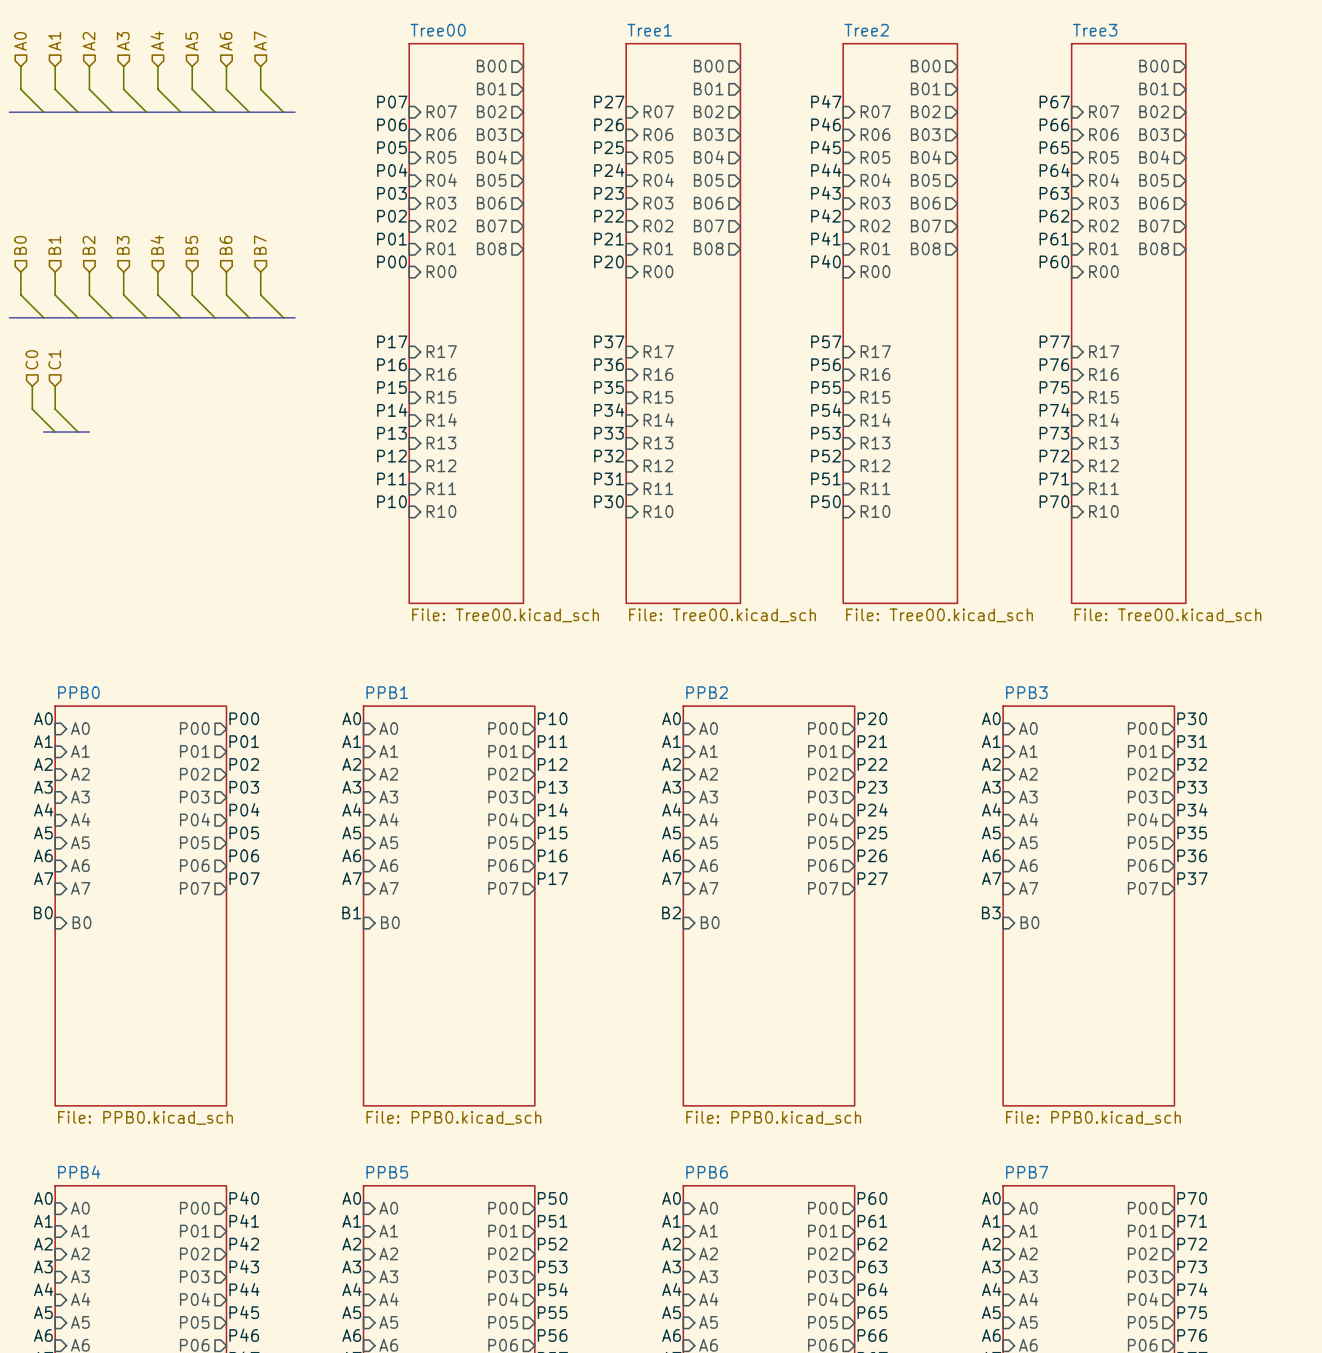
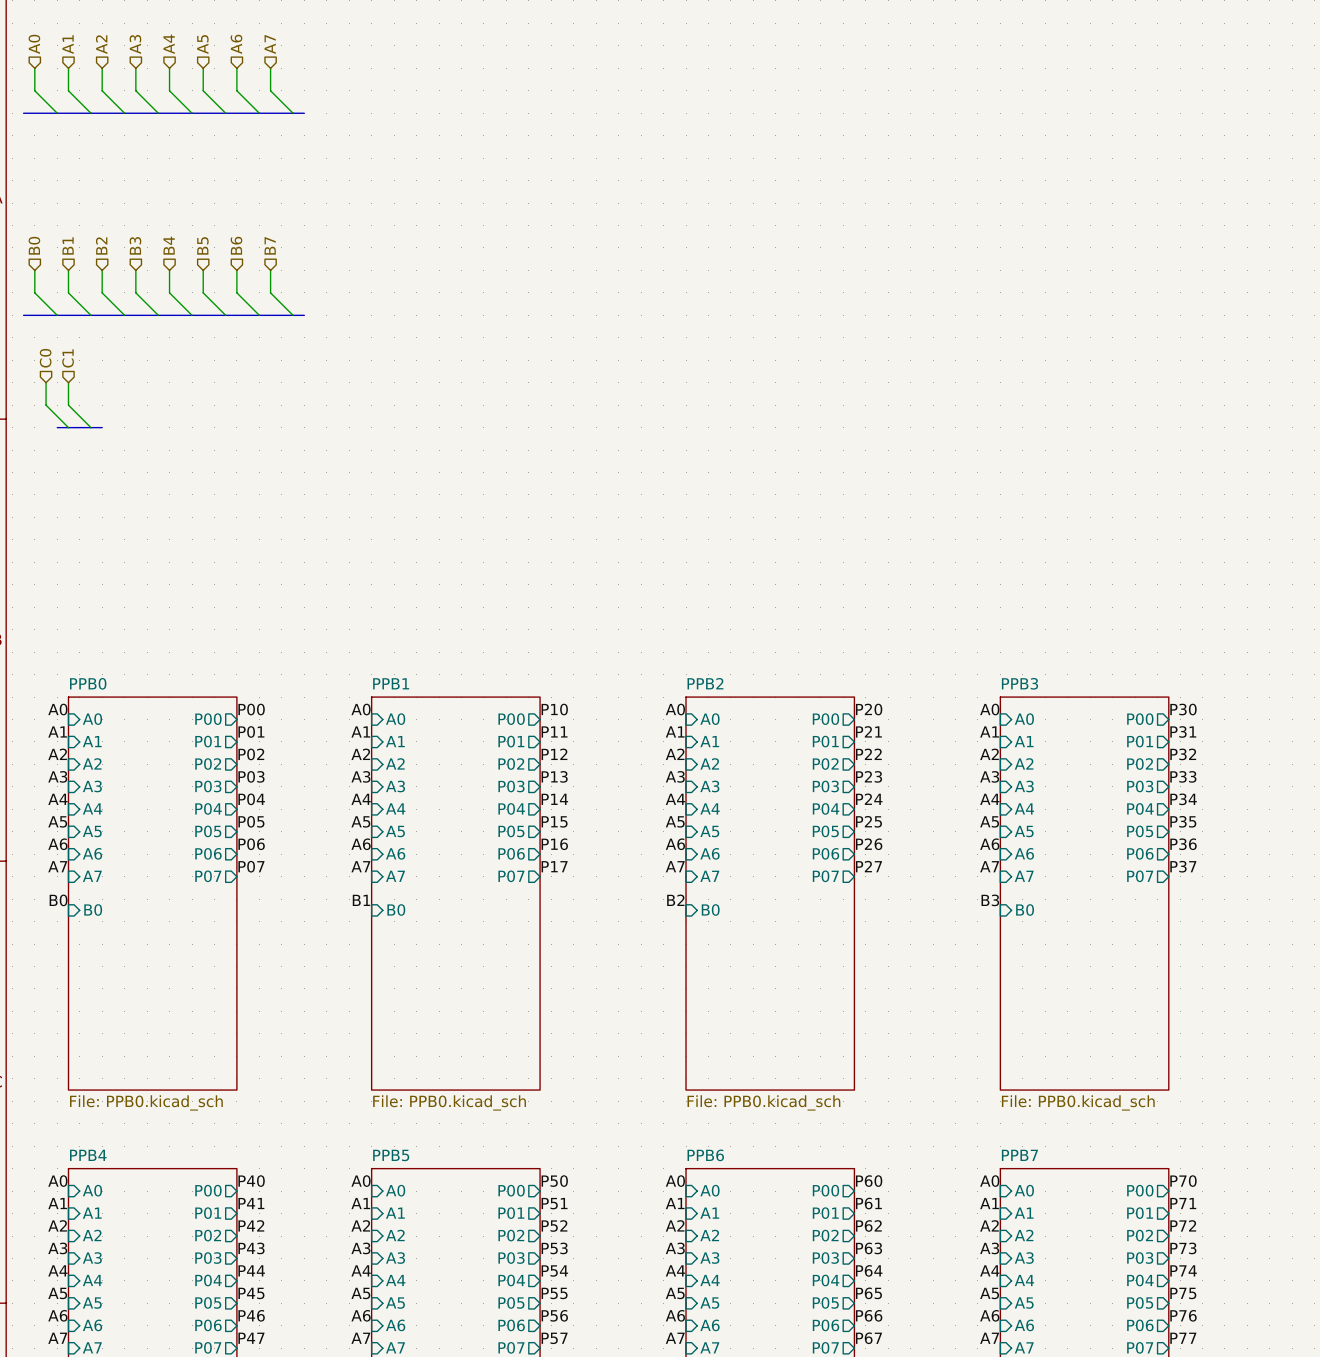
sheet pin: B00 (491, 66) -> none
sheet pin: B00 (708, 66) -> none
sheet pin: B00 (925, 66) -> none
sheet pin: B00 (1154, 66) -> none
sheet pin: B01 (491, 88) -> none
sheet pin: B01 (708, 88) -> none
sheet pin: B01 (925, 88) -> none
sheet pin: B01 (1154, 88) -> none
label: P47 (826, 101) -> none
label: P07 (392, 102) -> none
label: P27 (609, 102) -> none
label: P67 (1054, 102) -> none
sheet pin: R07 (441, 111) -> none
sheet pin: B02 (491, 111) -> none
sheet pin: R07 (658, 111) -> none
sheet pin: B02 (708, 111) -> none
sheet pin: R07 (875, 111) -> none
sheet pin: B02 (925, 111) -> none
sheet pin: R07 (1104, 111) -> none
sheet pin: B02 (1154, 111) -> none
label: P06 (391, 124) -> none
label: P26 (608, 124) -> none
label: P46 (825, 124) -> none
label: P66 (1054, 124) -> none
sheet pin: R06 (441, 134) -> none
sheet pin: B03 (491, 134) -> none
sheet pin: R06 (658, 134) -> none
sheet pin: B03 (708, 134) -> none
sheet pin: R06 (875, 134) -> none
sheet pin: B03 (925, 134) -> none
sheet pin: R06 (1103, 134) -> none
sheet pin: B03 (1154, 134) -> none
label: P05 (391, 147) -> none
label: P25 (608, 147) -> none
label: P45 (825, 147) -> none
label: P65 (1054, 147) -> none
sheet pin: R05 (441, 157) -> none
sheet pin: B04 (491, 157) -> none
sheet pin: R05 (658, 157) -> none
sheet pin: B04 (708, 157) -> none
sheet pin: R05 (875, 157) -> none
sheet pin: B04 (925, 157) -> none
sheet pin: R05 (1103, 157) -> none
sheet pin: B04 (1154, 157) -> none
label: P04 (392, 170) -> none
label: P24 (609, 170) -> none
label: P44 (826, 170) -> none
label: P64 (1054, 170) -> none
sheet pin: R04 (441, 180) -> none
sheet pin: B05 (491, 180) -> none
sheet pin: R04 (658, 180) -> none
sheet pin: B05 (708, 180) -> none
sheet pin: R04 (875, 180) -> none
sheet pin: B05 (925, 180) -> none
sheet pin: R04 (1104, 180) -> none
sheet pin: B05 (1154, 180) -> none
label: P03 (391, 193) -> none
label: P23 (608, 193) -> none
label: P43 (825, 193) -> none
label: P63 (1054, 193) -> none
sheet pin: R03 (441, 203) -> none
sheet pin: B06 (491, 203) -> none
sheet pin: R03 (658, 203) -> none
sheet pin: B06 (708, 203) -> none
sheet pin: R03 (875, 203) -> none
sheet pin: B06 (925, 203) -> none
sheet pin: R03 (1103, 203) -> none
sheet pin: B06 (1154, 203) -> none
label: P42 (825, 215) -> none
label: P02 (391, 216) -> none
label: P22 (608, 216) -> none
label: P62 (1054, 216) -> none
sheet pin: R02 (441, 226) -> none
sheet pin: B07 (491, 226) -> none
sheet pin: R02 (658, 226) -> none
sheet pin: B07 (708, 226) -> none
sheet pin: R02 (875, 226) -> none
sheet pin: B07 (925, 226) -> none
sheet pin: R02 (1103, 226) -> none
sheet pin: B07 (1154, 226) -> none
label: P41 (825, 238) -> none
label: P01 (391, 239) -> none
label: P21 (608, 239) -> none
label: P61 (1054, 239) -> none
sheet pin: R01 (441, 248) -> none
sheet pin: B08 (491, 248) -> none
sheet pin: R01 (658, 248) -> none
sheet pin: B08 (708, 248) -> none
sheet pin: R01 (875, 248) -> none
sheet pin: B08 (925, 248) -> none
sheet pin: R01 (1103, 248) -> none
sheet pin: B08 (1154, 248) -> none
label: P00 (391, 261) -> none
label: P20 (608, 261) -> none
label: P40 (825, 261) -> none
label: P60 (1054, 261) -> none
sheet pin: R00 (441, 271) -> none
sheet pin: R00 (658, 271) -> none
sheet pin: R00 (875, 271) -> none
sheet pin: R00 (1103, 271) -> none
sheet Tree00: File: Tree00.kicad_sch (466, 323) -> none
sheet Tree1: File: Tree00.kicad_sch (683, 323) -> none
sheet Tree2: File: Tree00.kicad_sch (900, 323) -> none
sheet Tree3: File: Tree00.kicad_sch (1128, 323) -> none
label: P17 (392, 341) -> none
label: P37 (609, 341) -> none
label: P57 (826, 341) -> none
label: P77 (1054, 341) -> none
sheet pin: R17 (441, 351) -> none
sheet pin: R17 (658, 351) -> none
sheet pin: R17 (875, 351) -> none
sheet pin: R17 (1104, 351) -> none
label: P16 (391, 364) -> none
label: P36 (608, 364) -> none
label: P56 (825, 364) -> none
label: P76 (1054, 364) -> none
sheet pin: R16 (441, 374) -> none
sheet pin: R16 (658, 374) -> none
sheet pin: R16 (875, 374) -> none
sheet pin: R16 (1103, 374) -> none
label: P15 (391, 387) -> none
label: P35 (608, 387) -> none
label: P55 (825, 387) -> none
label: P75 (1054, 387) -> none
sheet pin: R15 (441, 397) -> none
sheet pin: R15 (658, 397) -> none
sheet pin: R15 (875, 397) -> none
sheet pin: R15 (1103, 397) -> none
label: P14 (392, 410) -> none
label: P34 (609, 410) -> none
label: P54 (826, 410) -> none
label: P74 (1054, 410) -> none
sheet pin: R14 (441, 419) -> none
sheet pin: R14 (658, 419) -> none
sheet pin: R14 (875, 419) -> none
sheet pin: R14 (1104, 419) -> none
label: P13 (391, 433) -> none
label: P33 (608, 433) -> none
label: P53 (825, 433) -> none
label: P73 (1054, 433) -> none
sheet pin: R13 (441, 443) -> none
sheet pin: R13 (658, 443) -> none
sheet pin: R13 (875, 443) -> none
sheet pin: R13 (1103, 443) -> none
label: P12 (391, 456) -> none
label: P32 (608, 456) -> none
label: P52 (825, 456) -> none
label: P72 (1054, 456) -> none
sheet pin: R12 (441, 465) -> none
sheet pin: R12 (658, 465) -> none
sheet pin: R12 (875, 465) -> none
sheet pin: R12 (1103, 465) -> none
label: P11 (391, 478) -> none
label: P31 (608, 478) -> none
label: P51 (825, 478) -> none
label: P71 (1054, 478) -> none
sheet pin: R11 (441, 488) -> none
sheet pin: R11 (658, 488) -> none
sheet pin: R11 (875, 488) -> none
sheet pin: R11 (1103, 488) -> none
label: P10 (391, 501) -> none
label: P30 (608, 501) -> none
label: P50 (825, 501) -> none
label: P70 (1054, 501) -> none
sheet pin: R10 (441, 511) -> none
sheet pin: R10 (658, 511) -> none
sheet pin: R10 (875, 511) -> none
sheet pin: R10 (1103, 511) -> none

